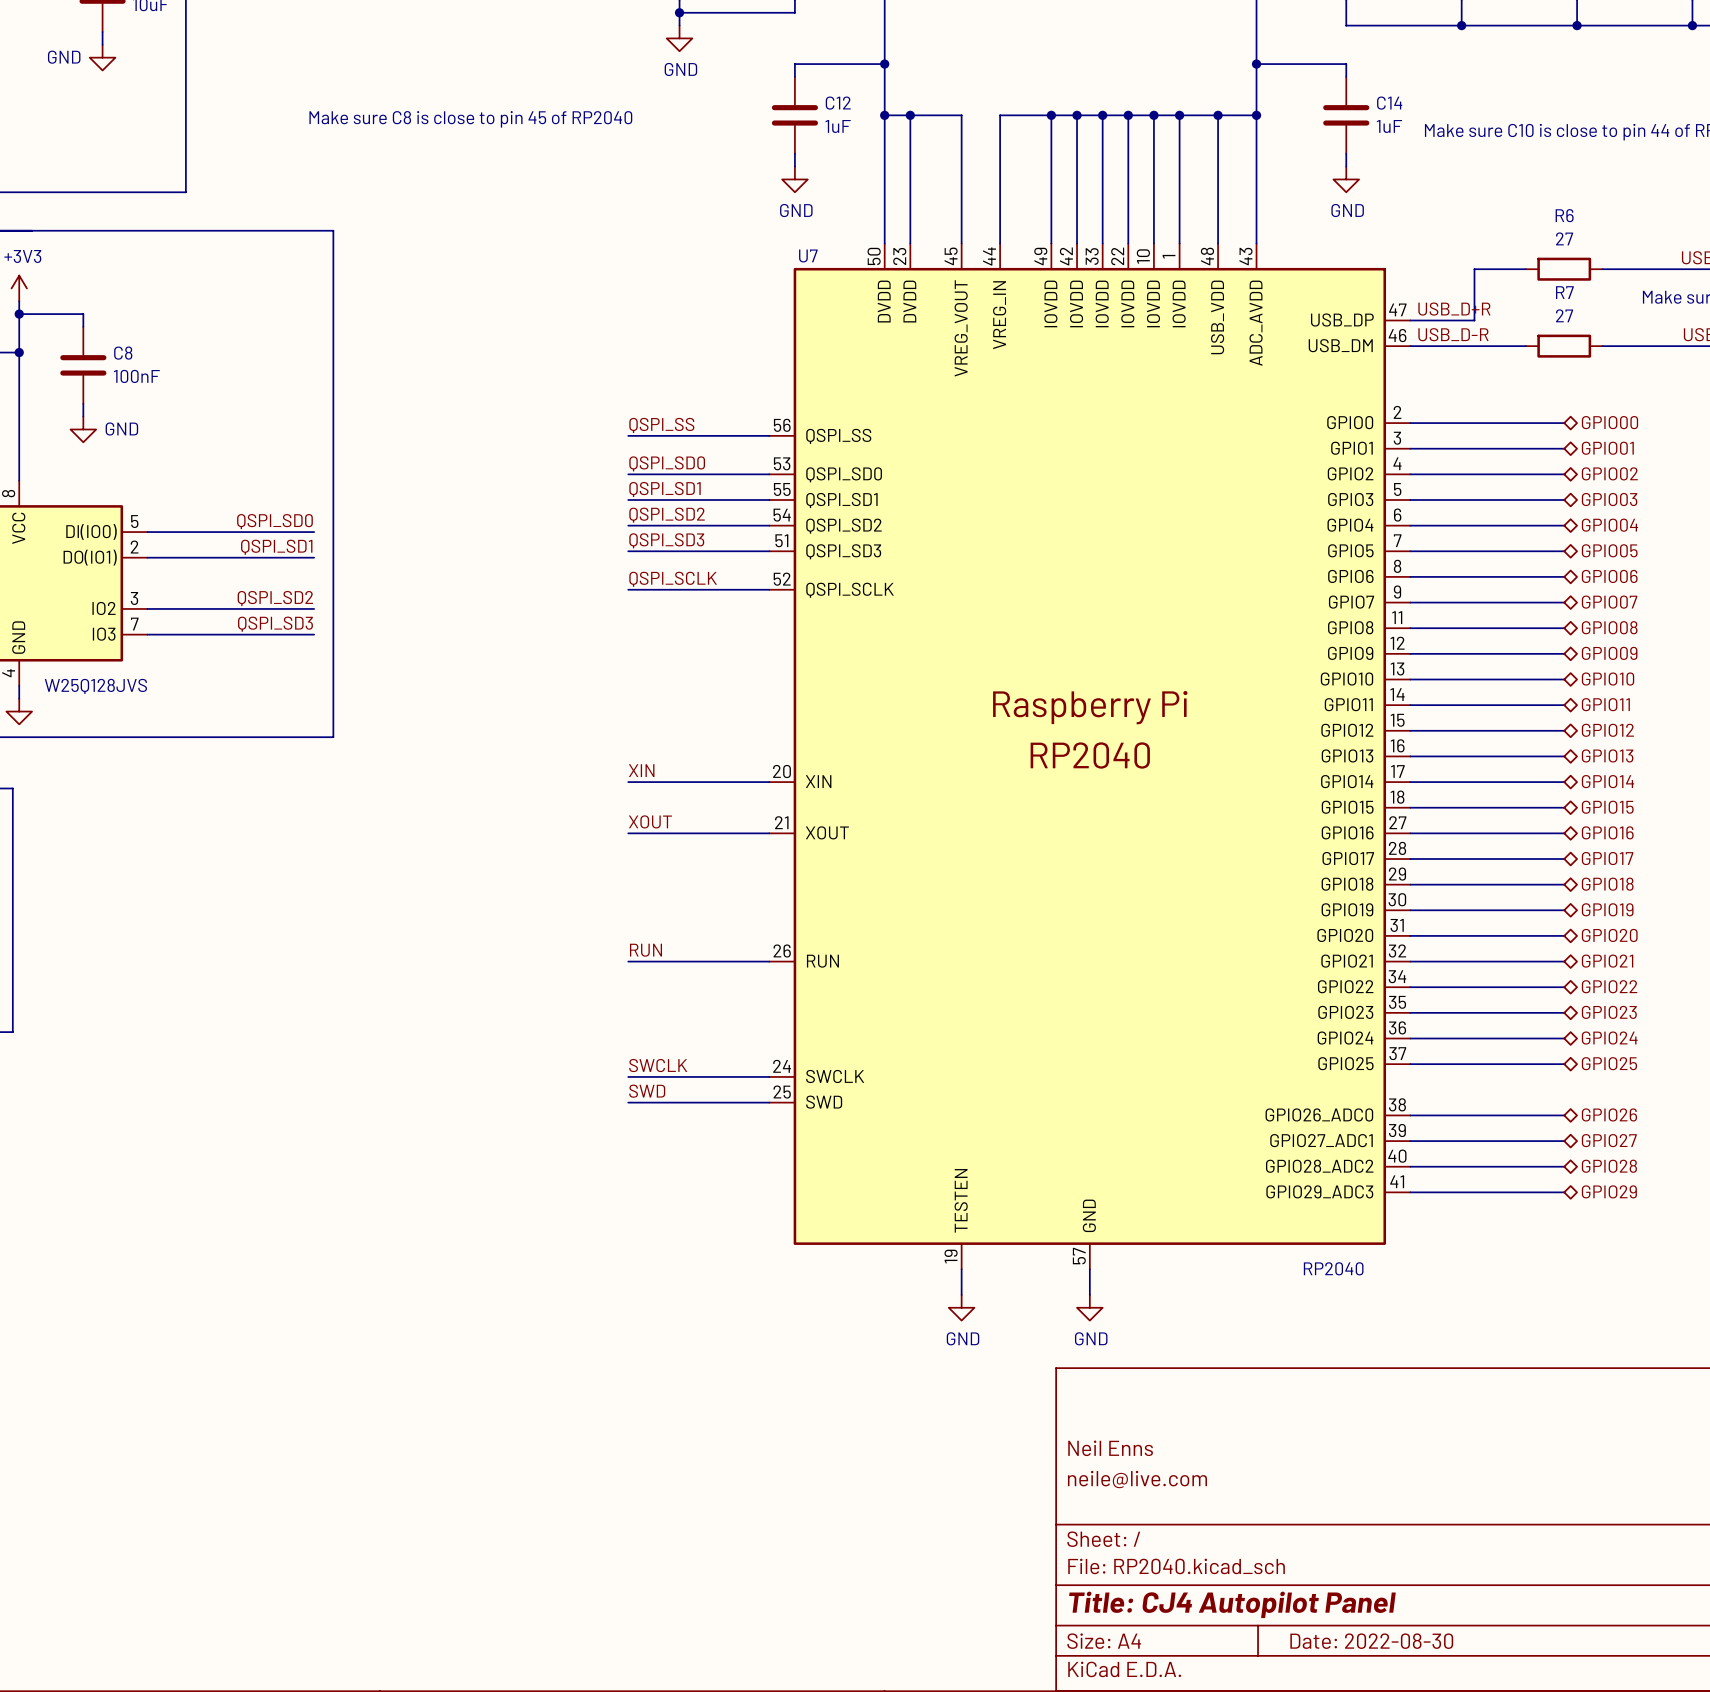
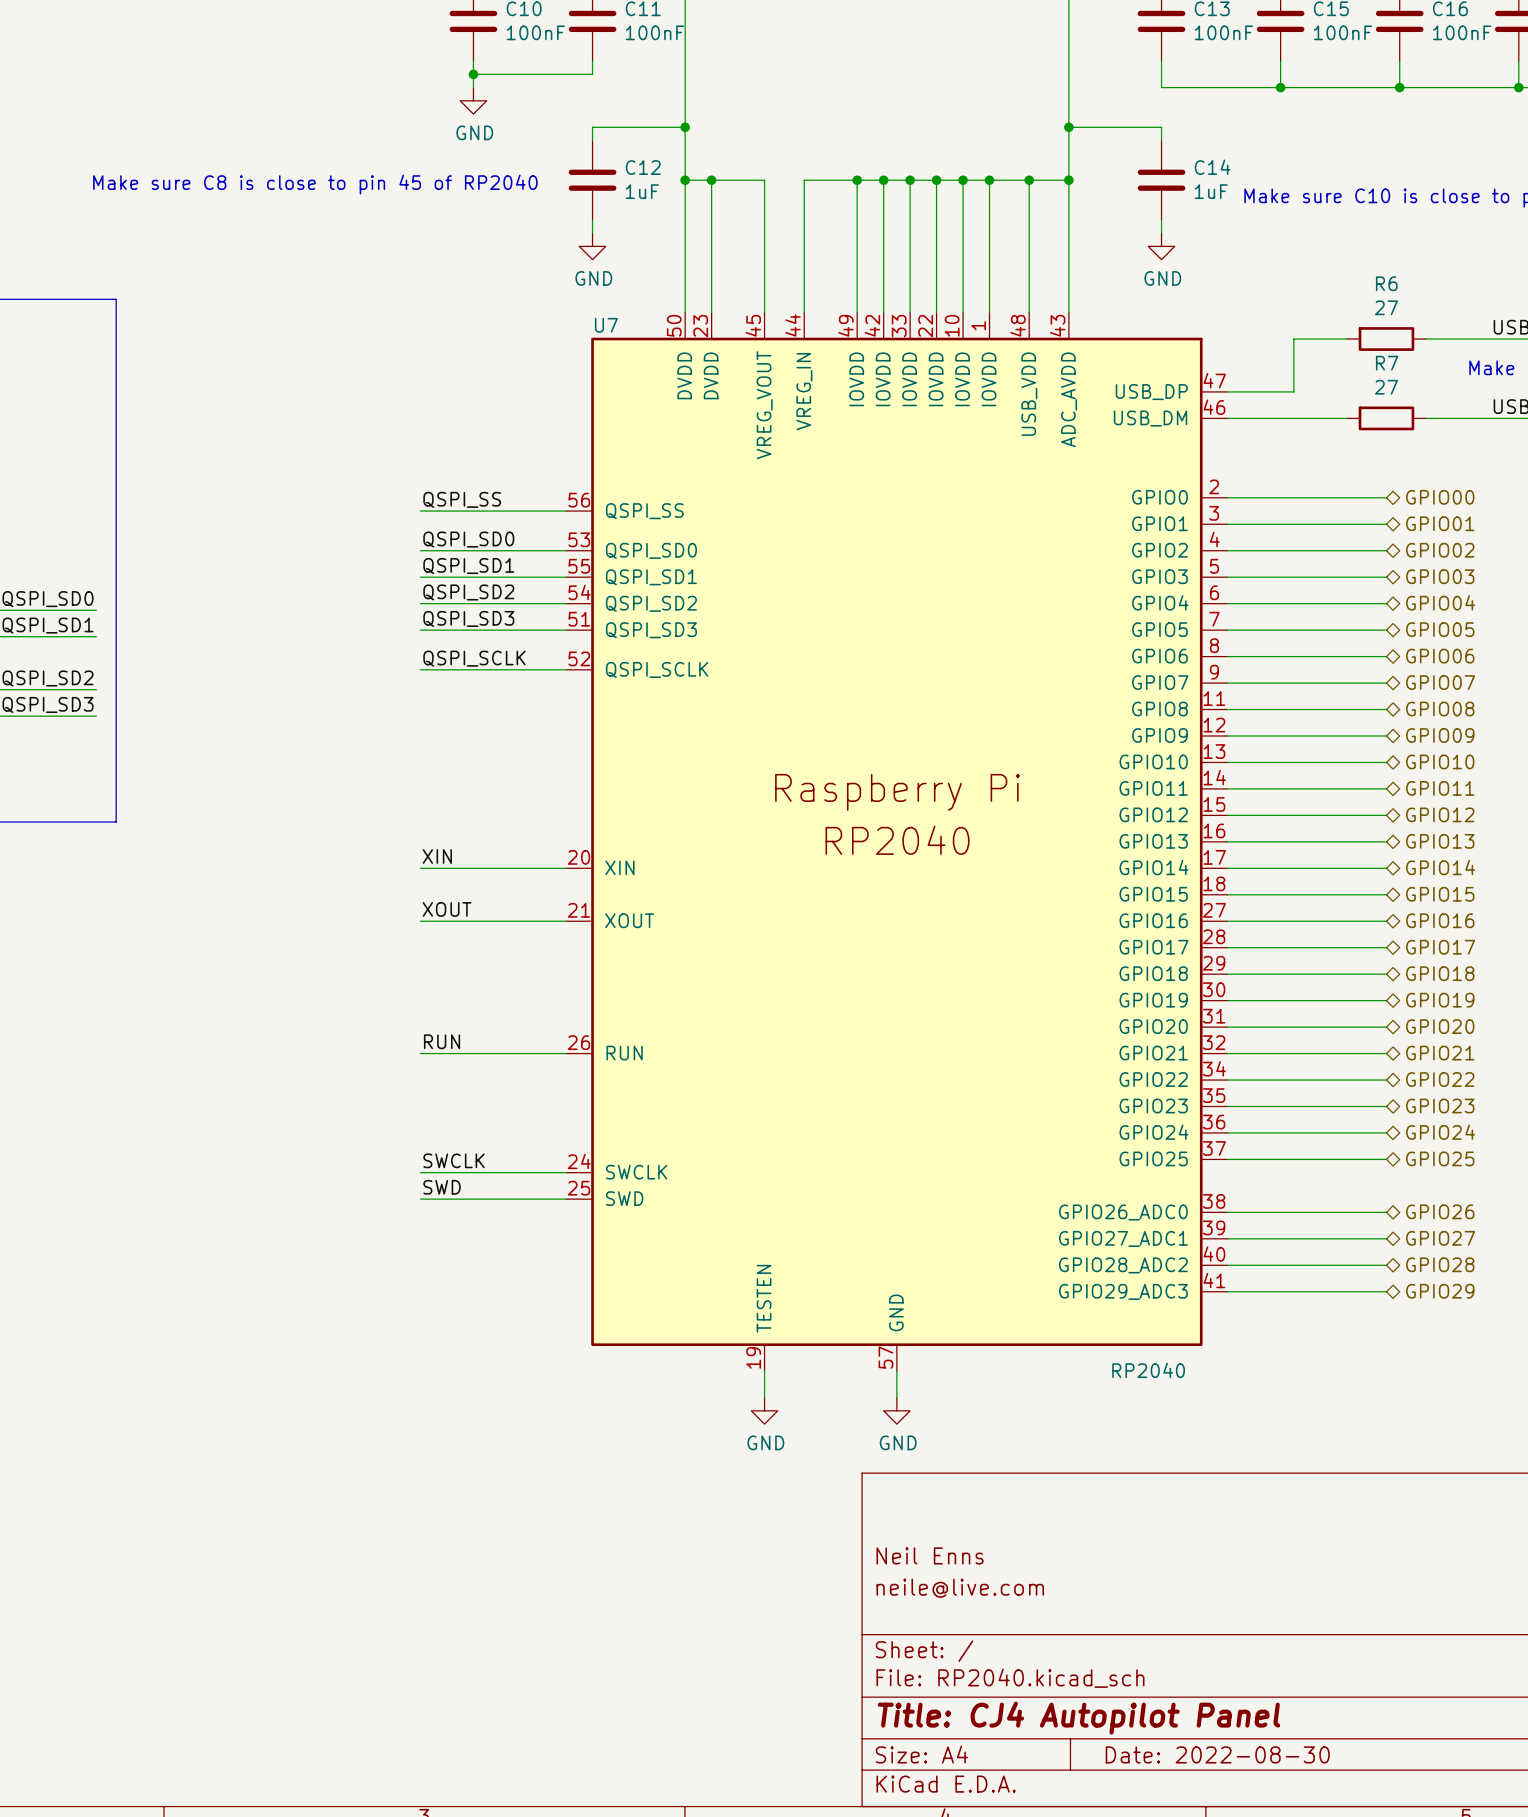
label: USB_D+R (1454, 309) -> none
label: USB_D-R (1453, 334) -> none

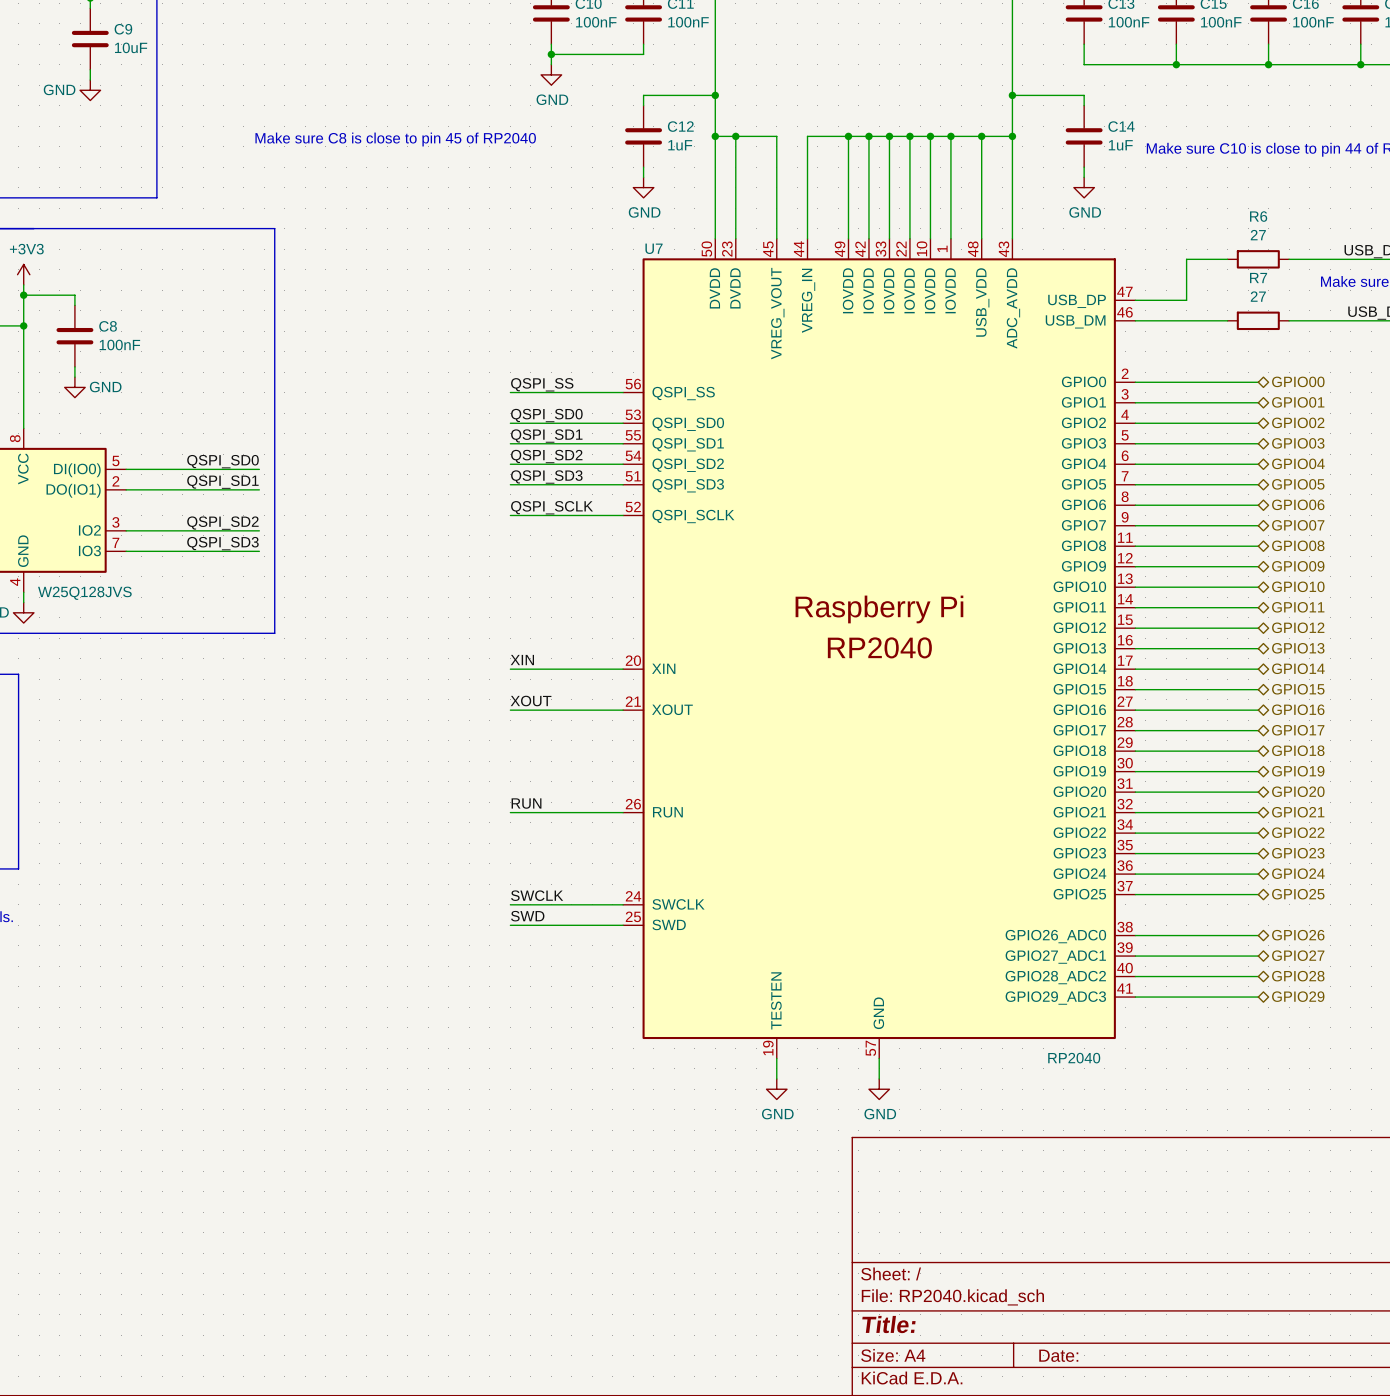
title block: Neil Enns (930, 1555) -> none
title block: neile@live.com (960, 1588) -> none
title block: Title: CJ4 Autopilot Panel (1078, 1718) -> Title: (888, 1324)
title block: Date: 2022-08-30 (1217, 1754) -> Date: (1058, 1355)

